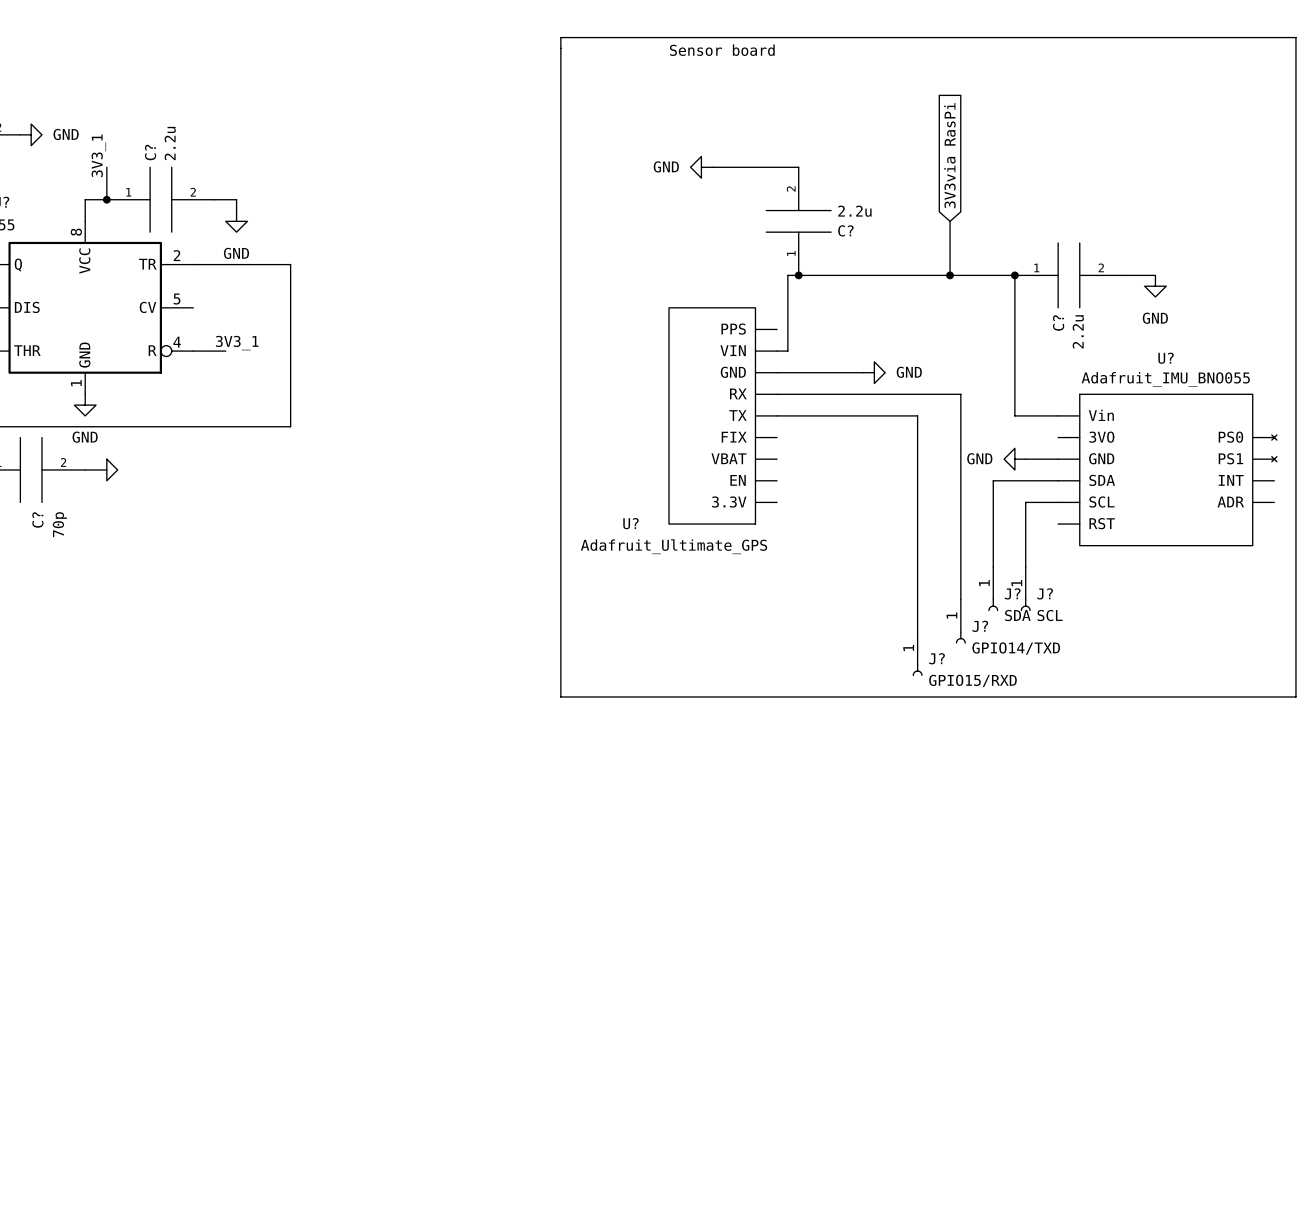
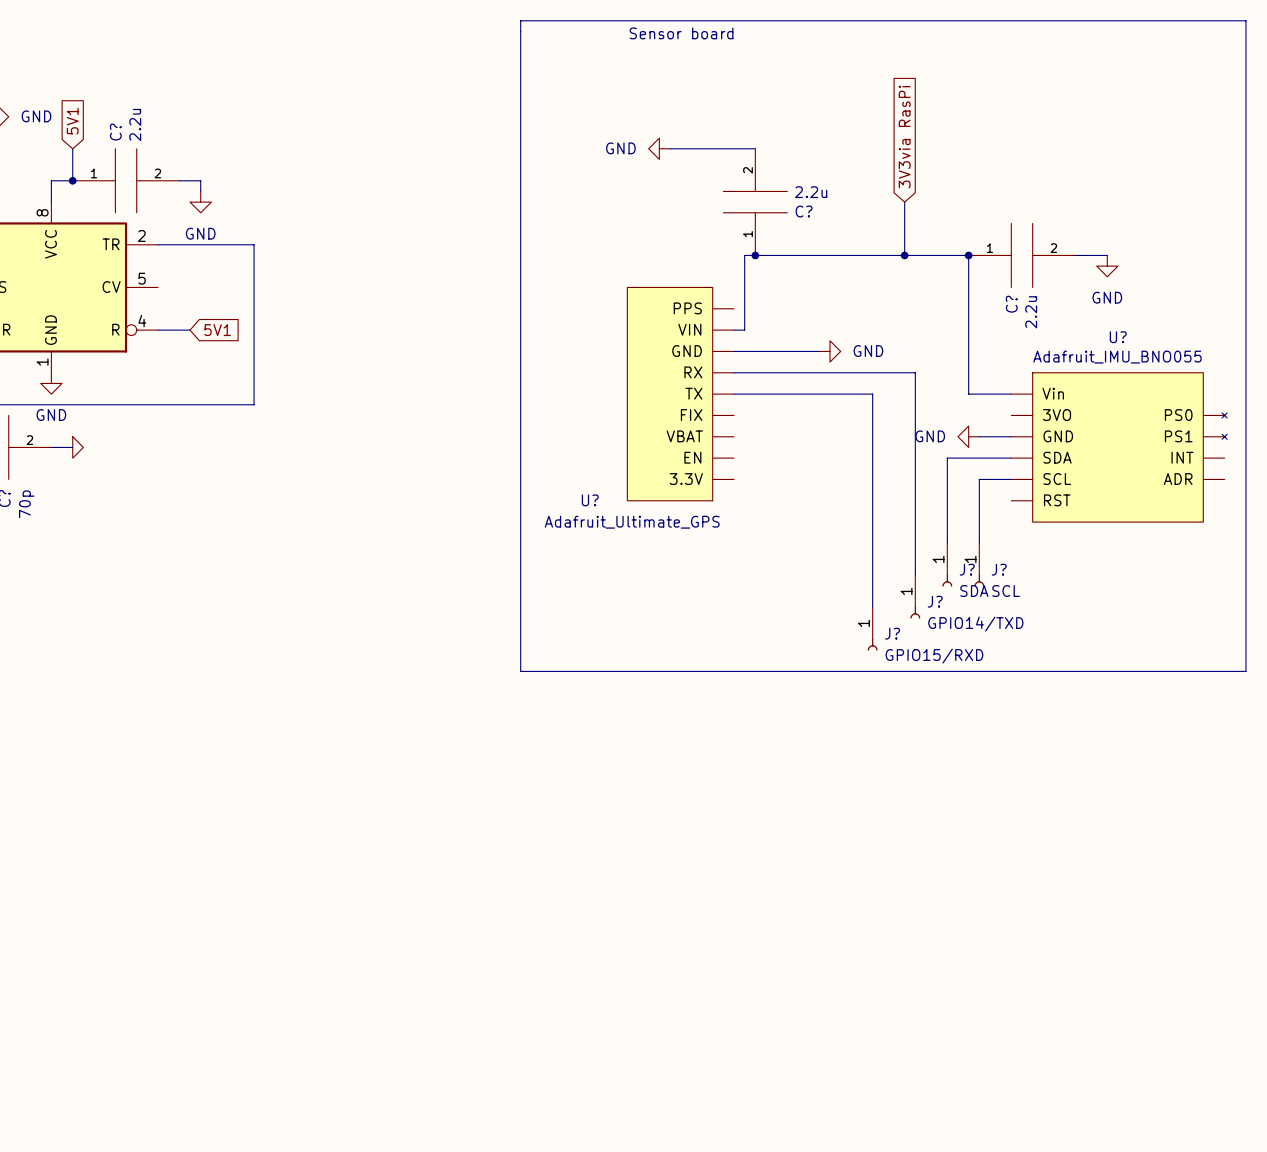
global label: none -> 5V1 (72, 121)
label: 3V3_1 (98, 155) -> none
label: 3V3_1 (237, 343) -> none
global label: none -> 5V1 (217, 330)

